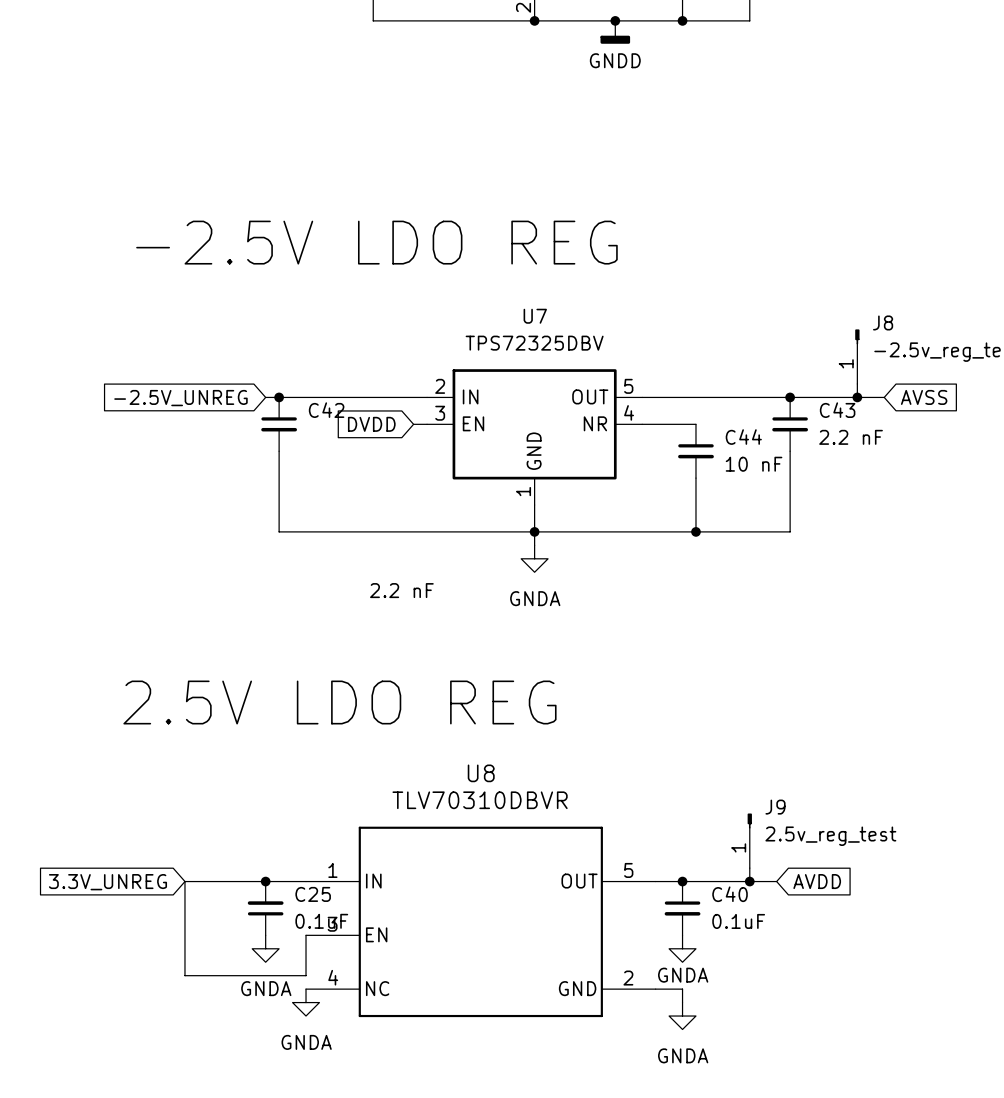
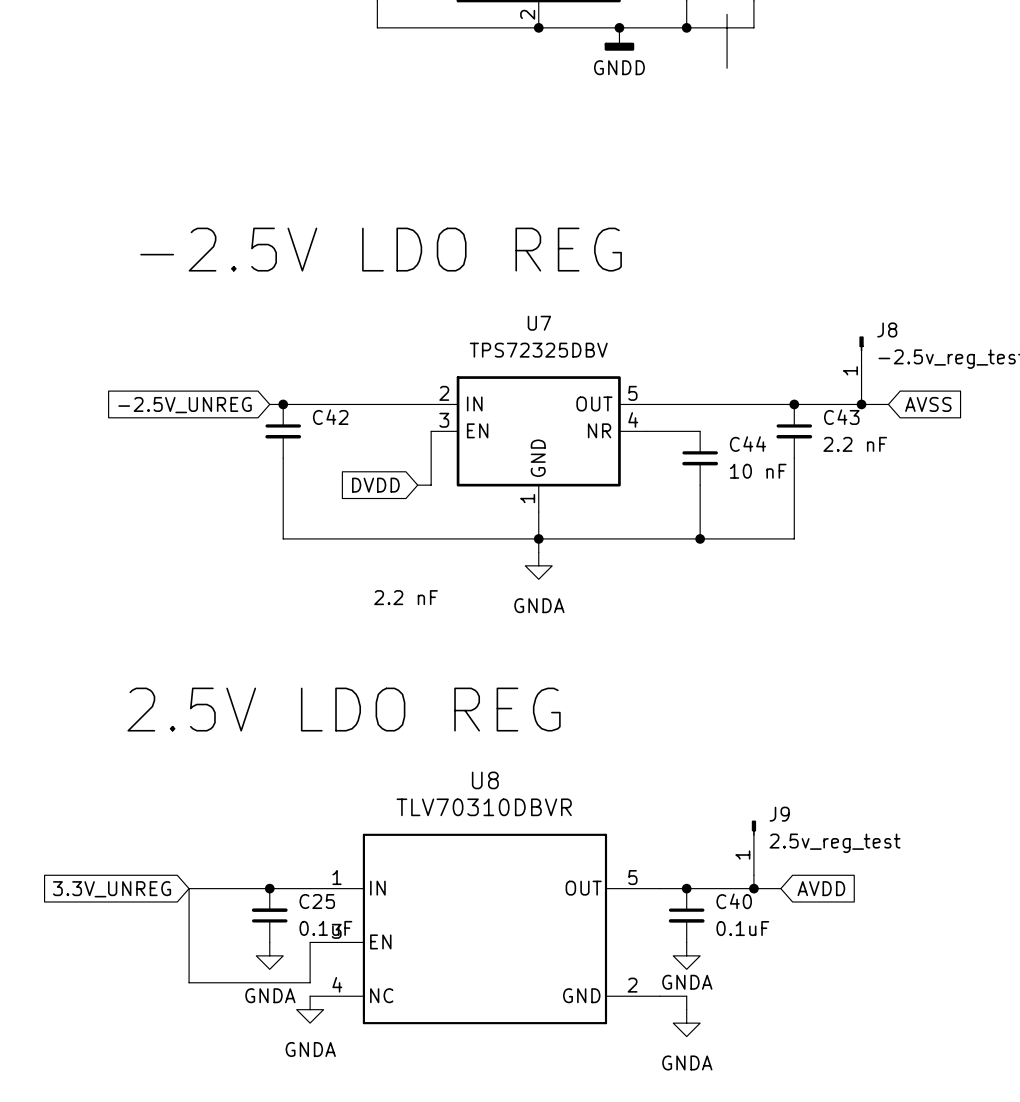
wire: none -> (727, 14) (727, 68)
global label position: DVDD (371, 424) -> DVDD (375, 485)
wire: (413, 424) (427, 424) -> (417, 485) (431, 485) (431, 431)

